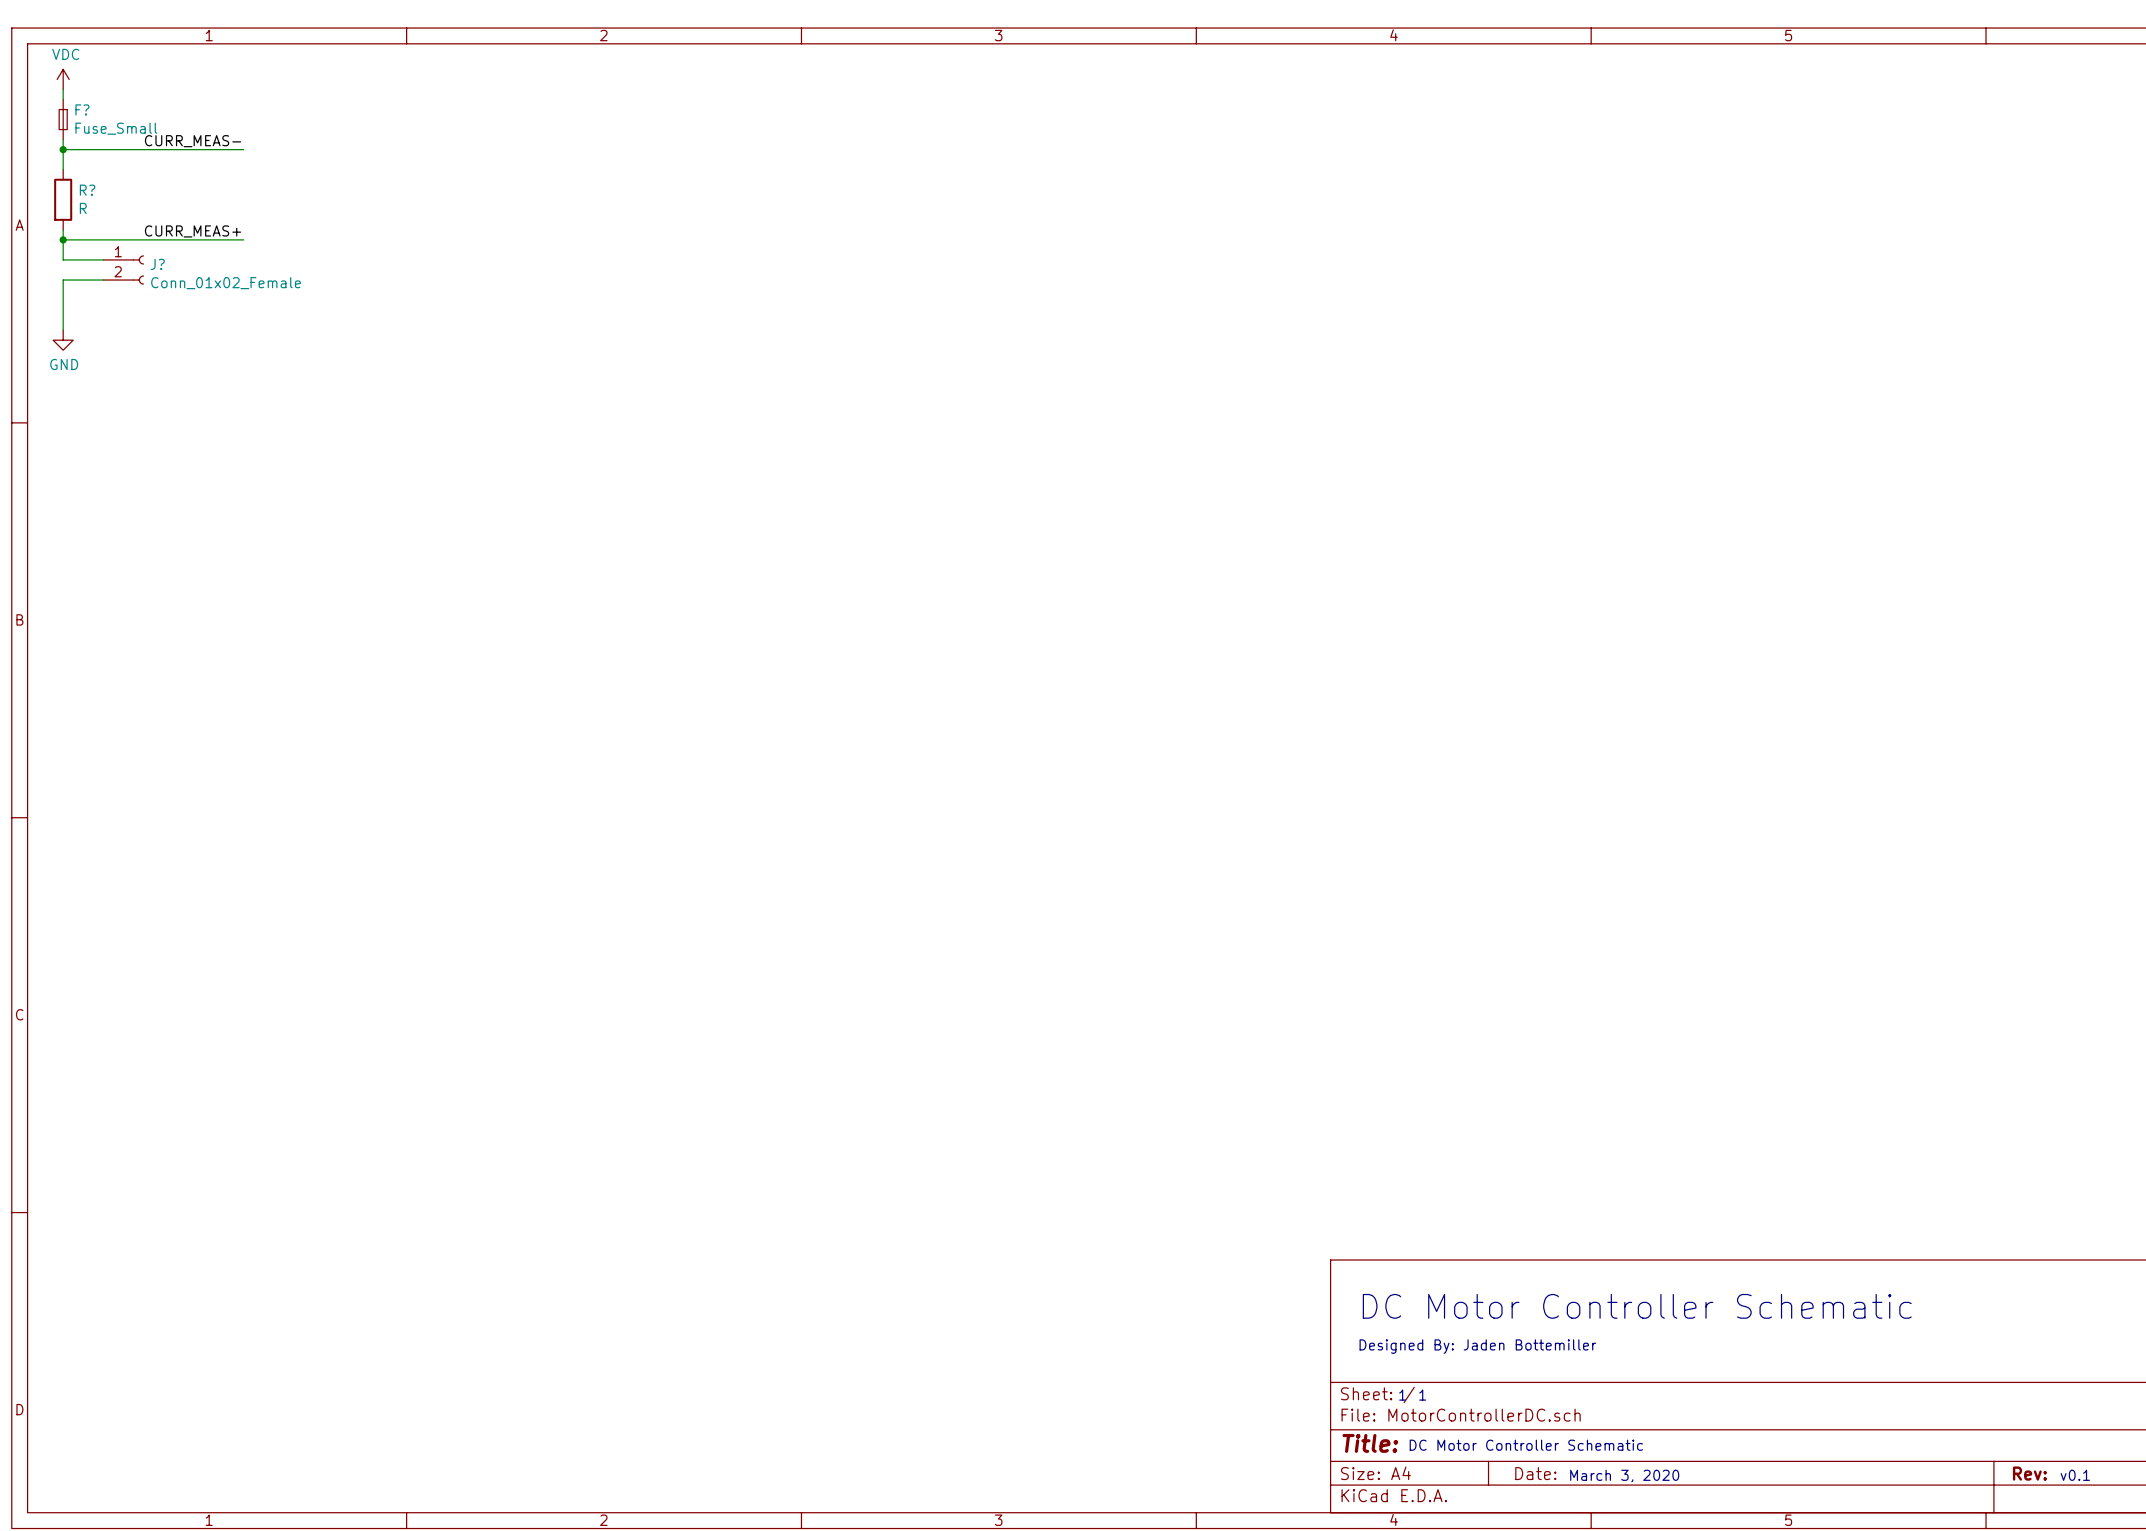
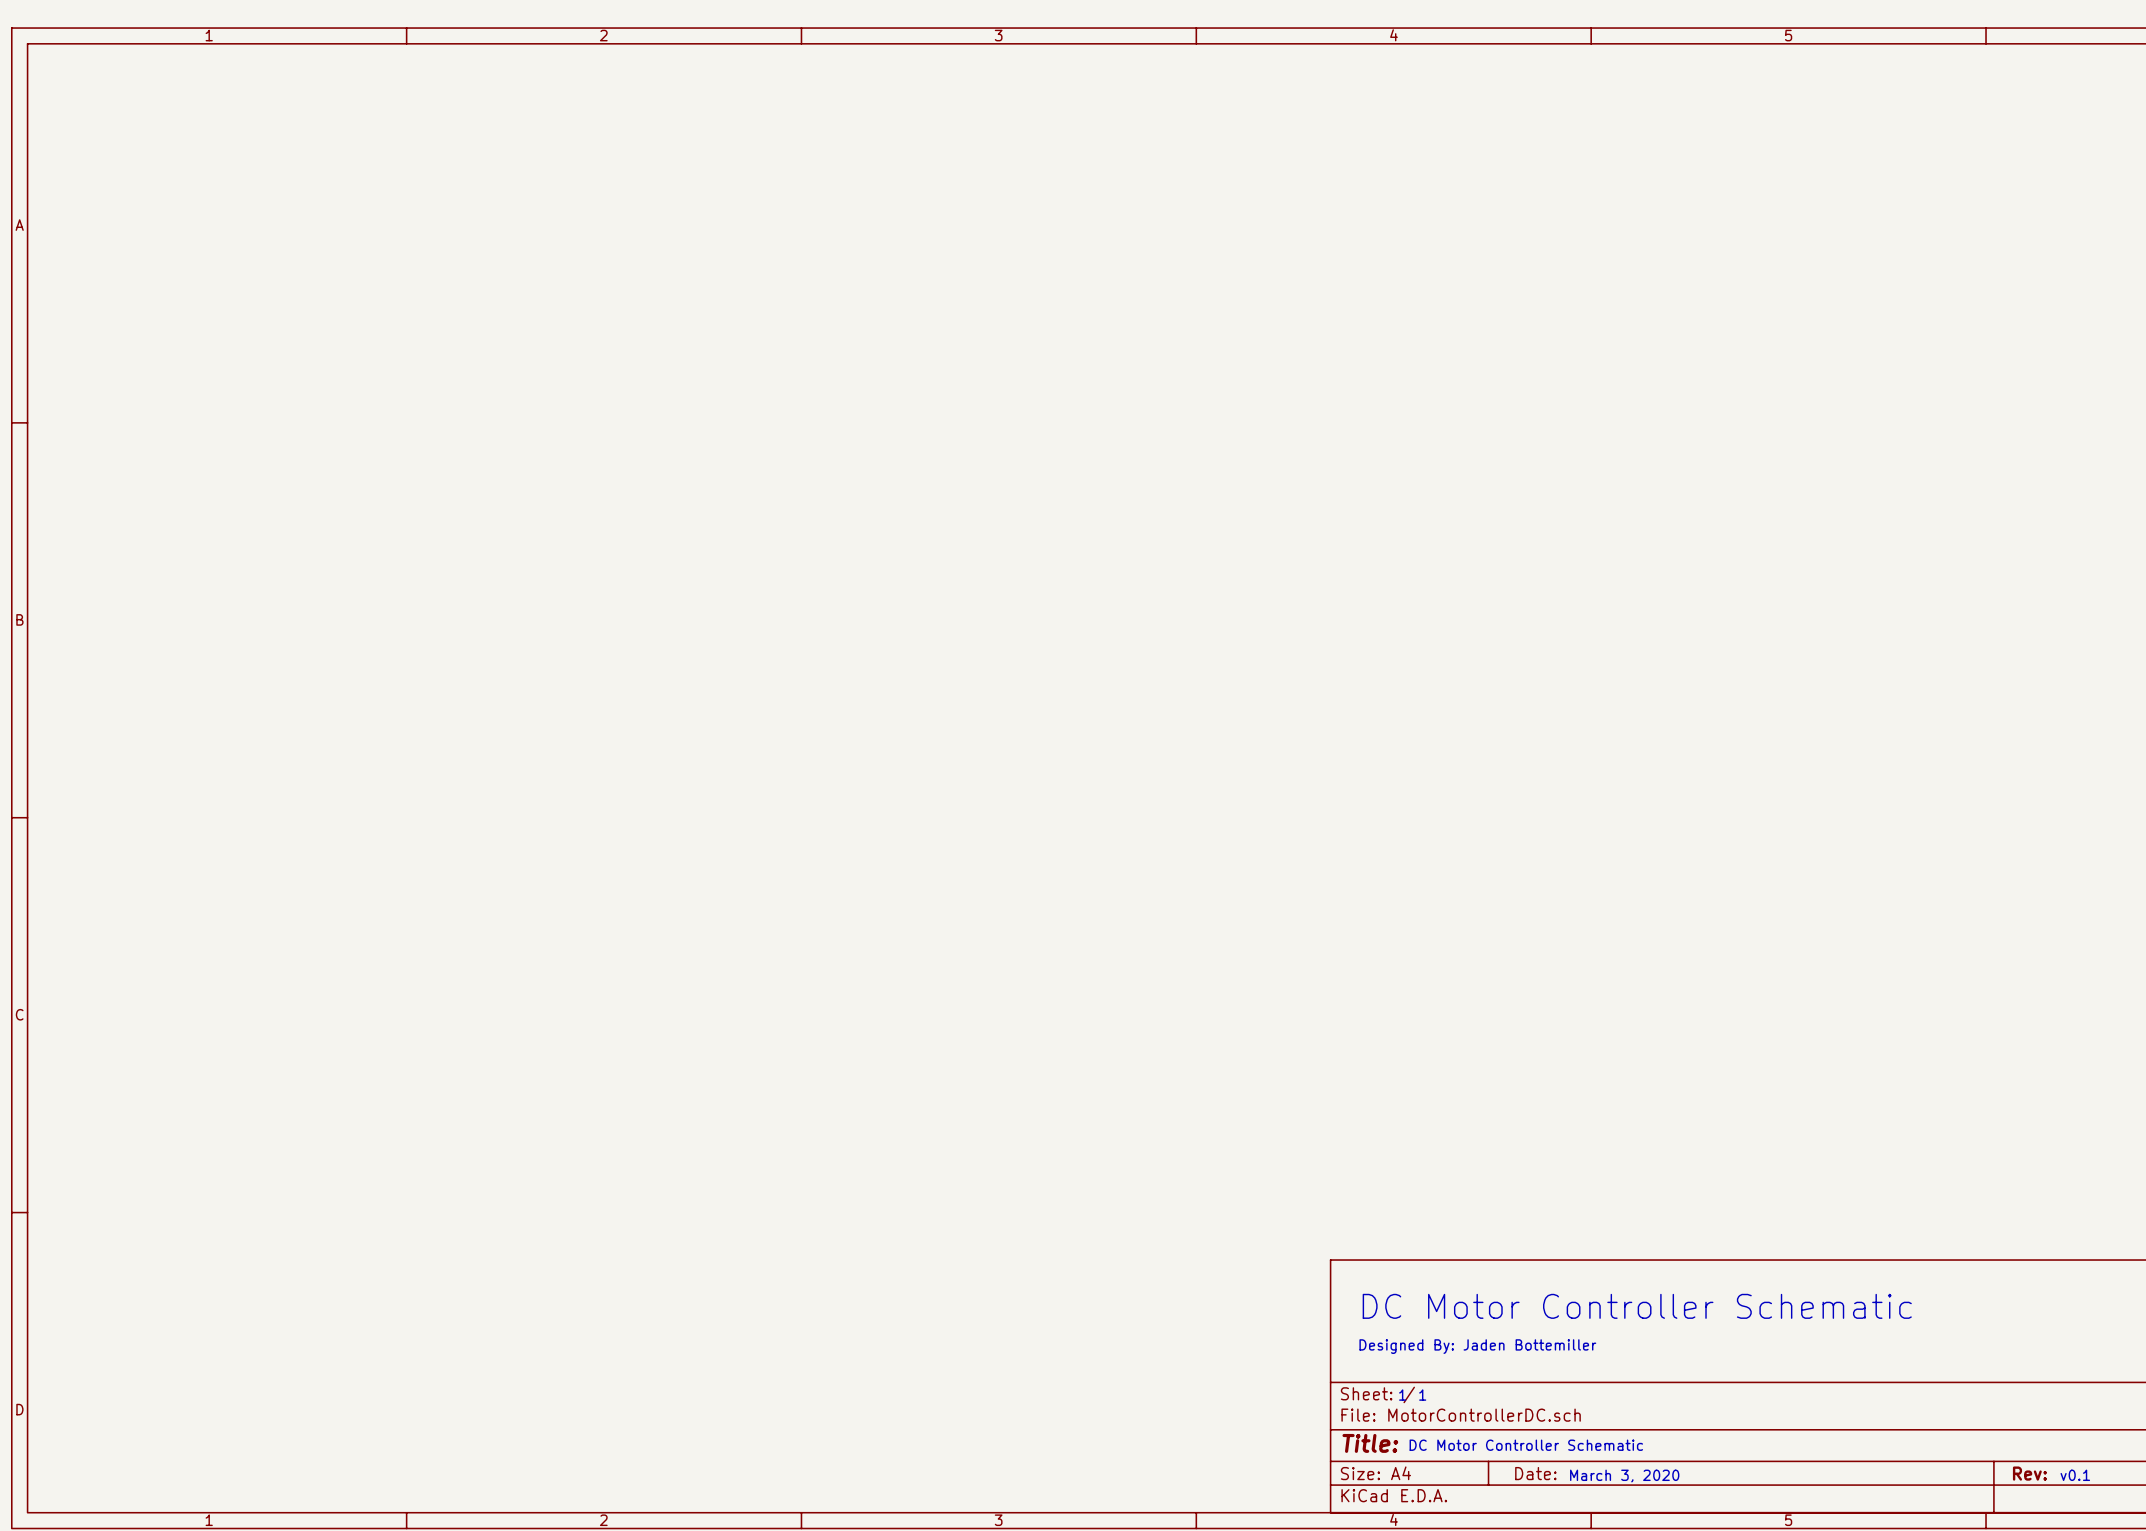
power symbol: VDC (63, 79) -> none
wire: (63, 89) (63, 99) -> none
F?: Fuse_Small (63, 119) -> none
wire: (63, 139) (63, 169) -> none
label: CURR_MEAS- (193, 141) -> none
wire: (63, 149) (243, 149) -> none
junction: (63, 149) -> none
R?: R (63, 199) -> none
wire: (63, 229) (63, 259) (103, 259) -> none
label: CURR_MEAS+ (193, 231) -> none
wire: (63, 239) (243, 239) -> none
junction: (63, 239) -> none
J?: Conn_01x02_Female (123, 269) -> none
wire: (103, 280) (63, 280) (63, 330) -> none
power symbol: GND (63, 340) -> none

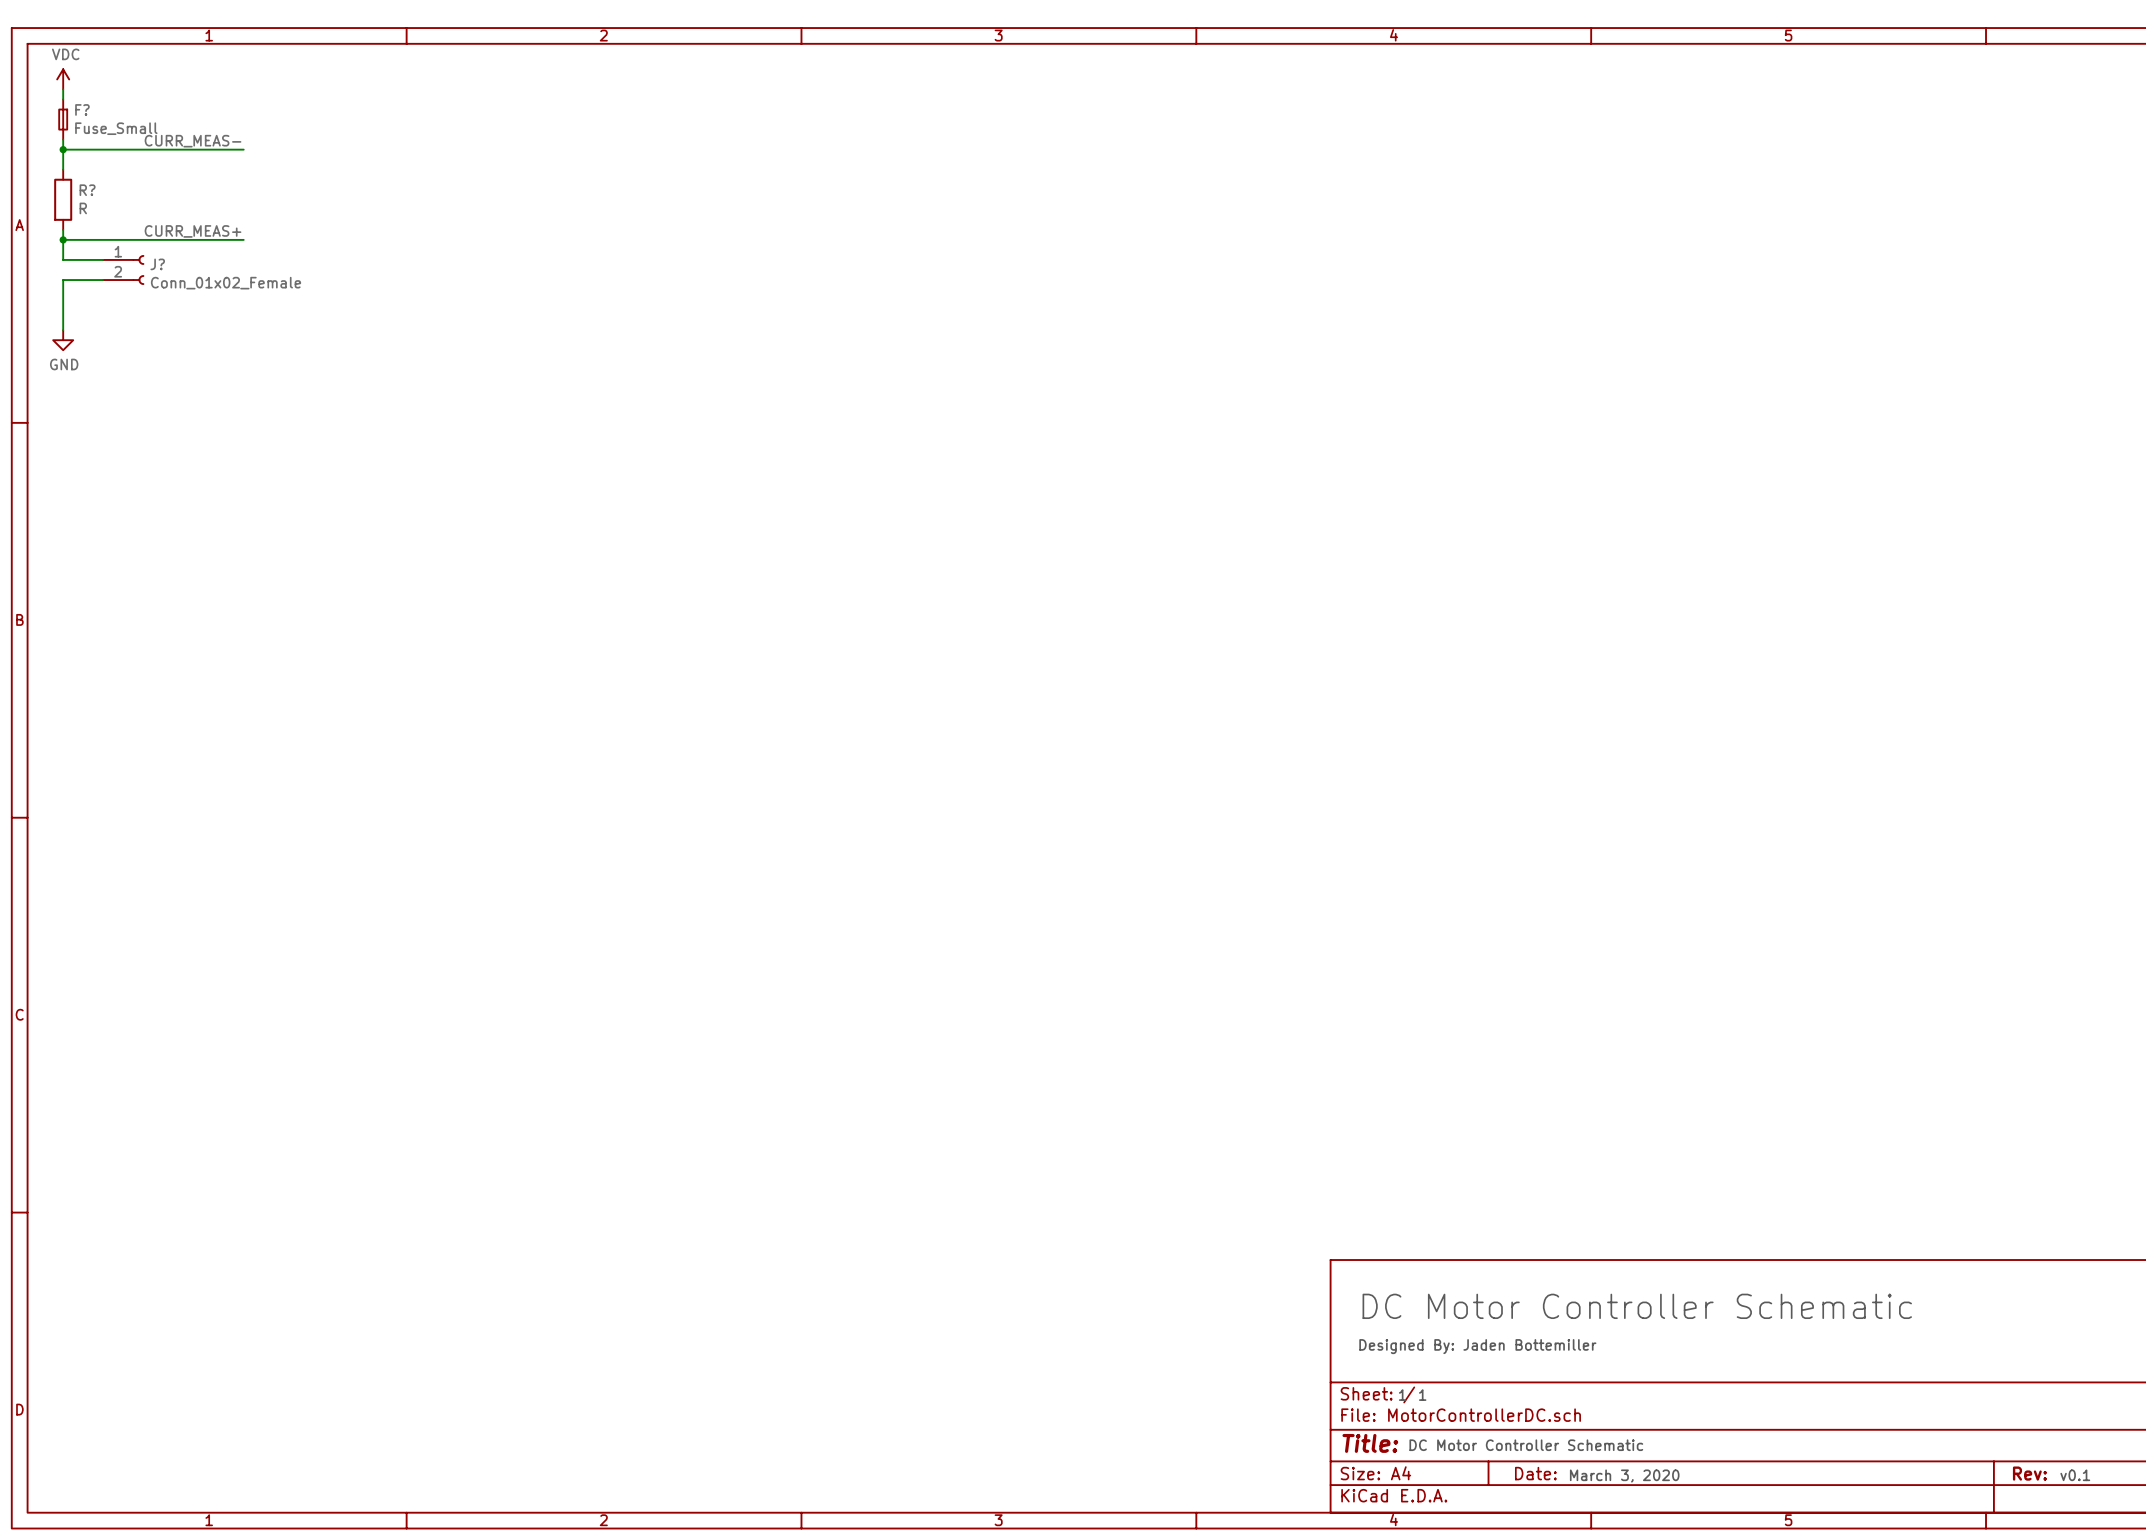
power symbol: none -> VDC (63, 79)
wire: none -> (63, 89) (63, 99)
F?: none -> Fuse_Small (63, 119)
wire: none -> (63, 139) (63, 169)
label: none -> CURR_MEAS- (193, 141)
wire: none -> (63, 149) (243, 149)
junction: none -> (63, 149)
R?: none -> R (63, 199)
wire: none -> (63, 229) (63, 259) (103, 259)
label: none -> CURR_MEAS+ (193, 231)
wire: none -> (63, 239) (243, 239)
junction: none -> (63, 239)
J?: none -> Conn_01x02_Female (123, 269)
wire: none -> (103, 280) (63, 280) (63, 330)
power symbol: none -> GND (63, 340)

